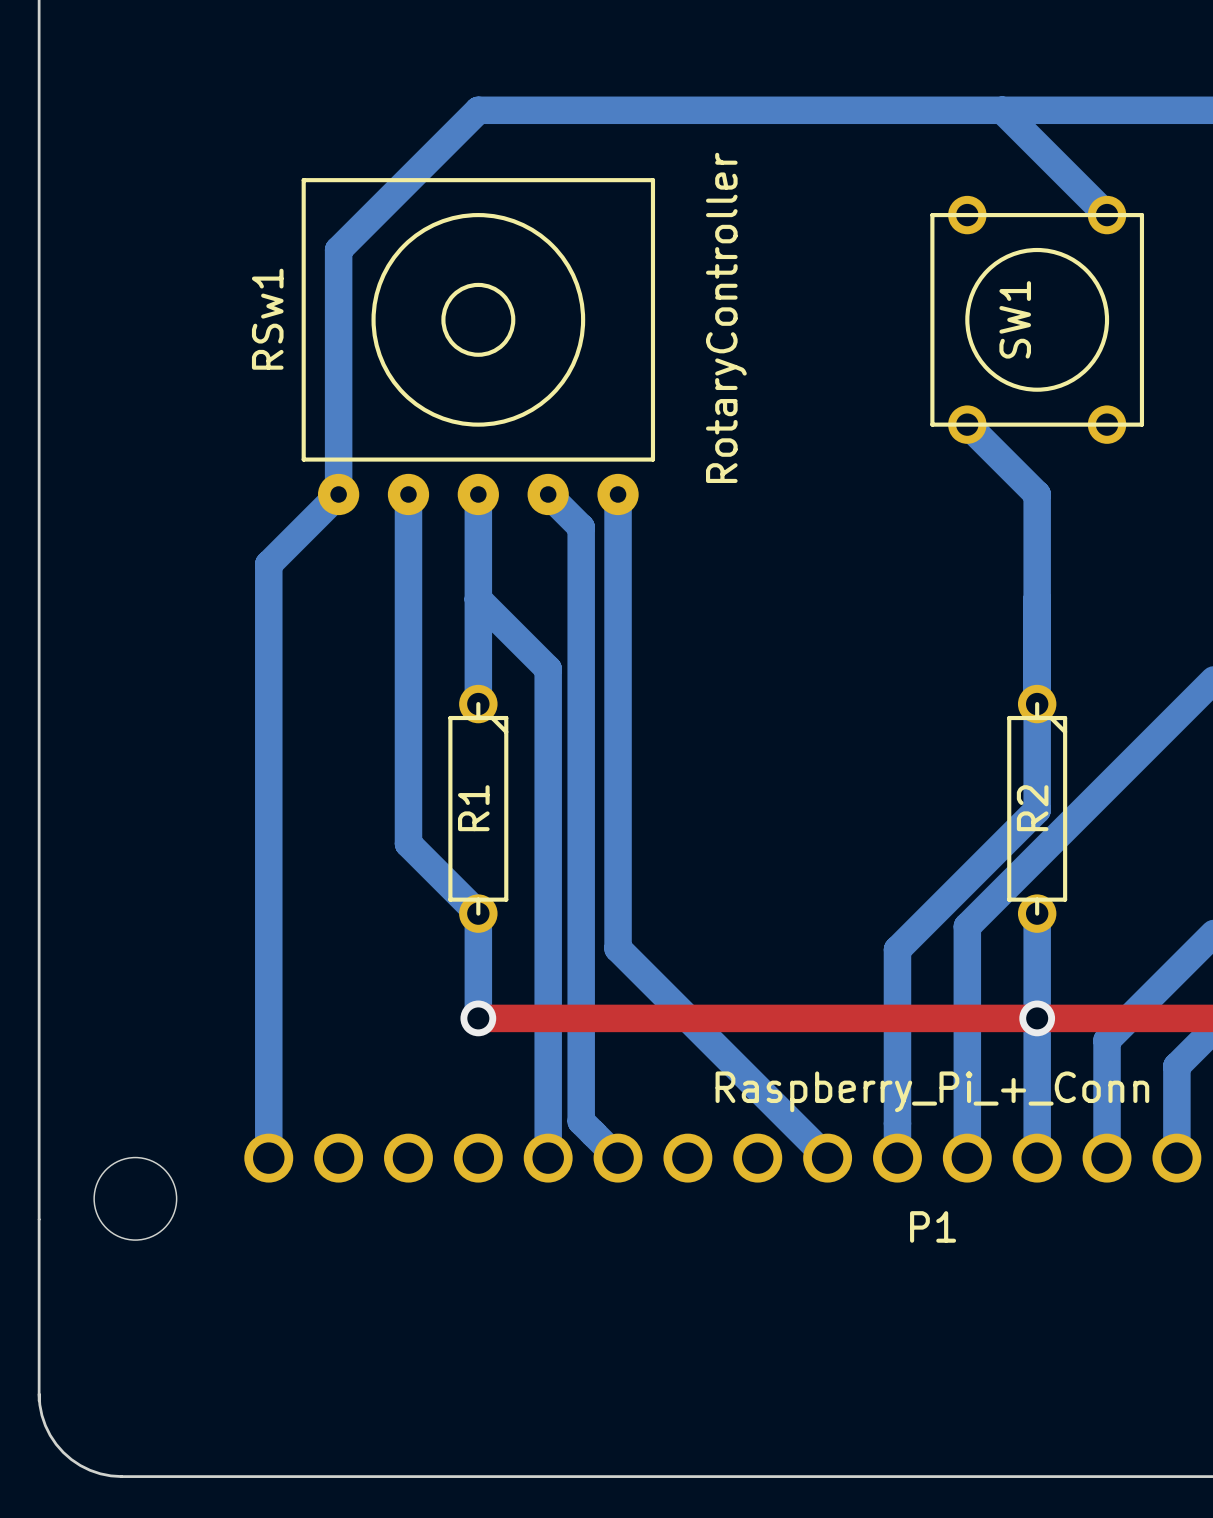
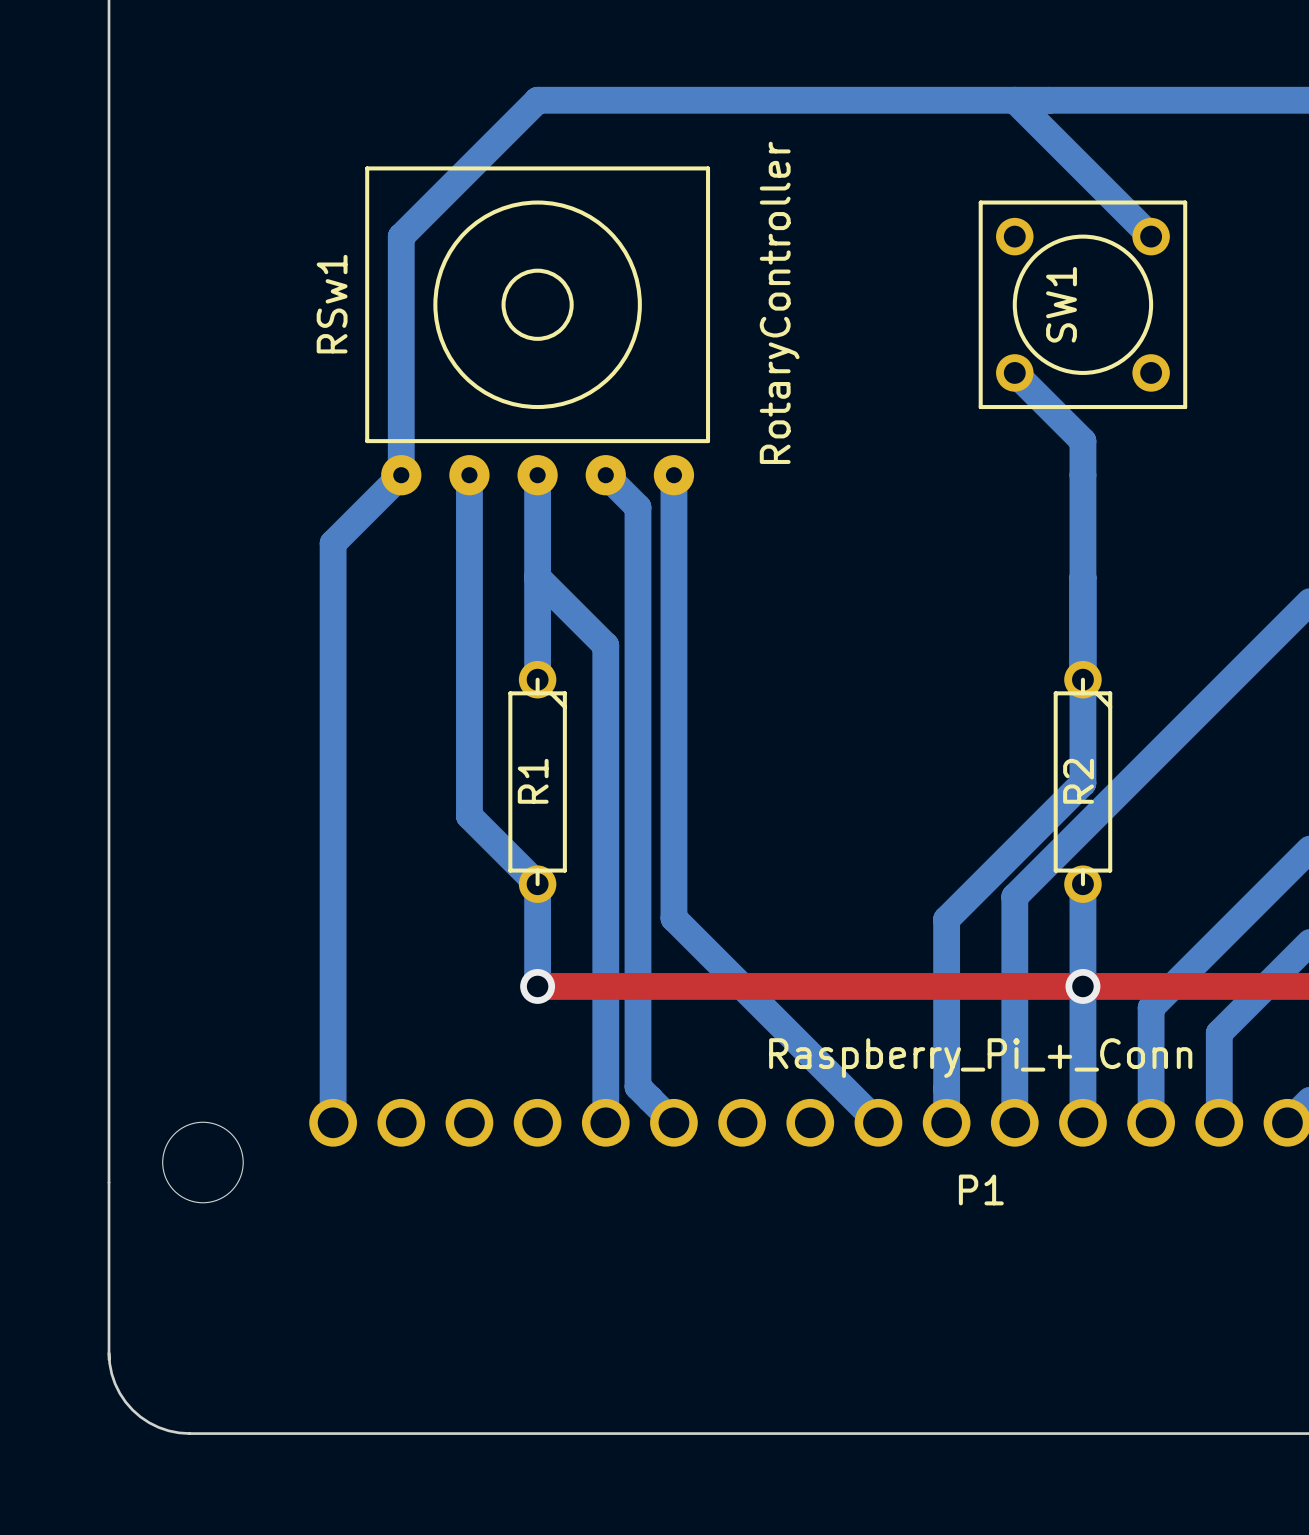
bottom track: none -> (1014, 100) (1151, 236)
bottom track: (1002, 110) (1107, 215) -> none
SW1 footprint: [930, 195, 1145, 444] -> [978, 200, 1188, 410]
bottom track: (967, 424) (1037, 494) -> (1014, 372) (1082, 441) (1082, 475)

